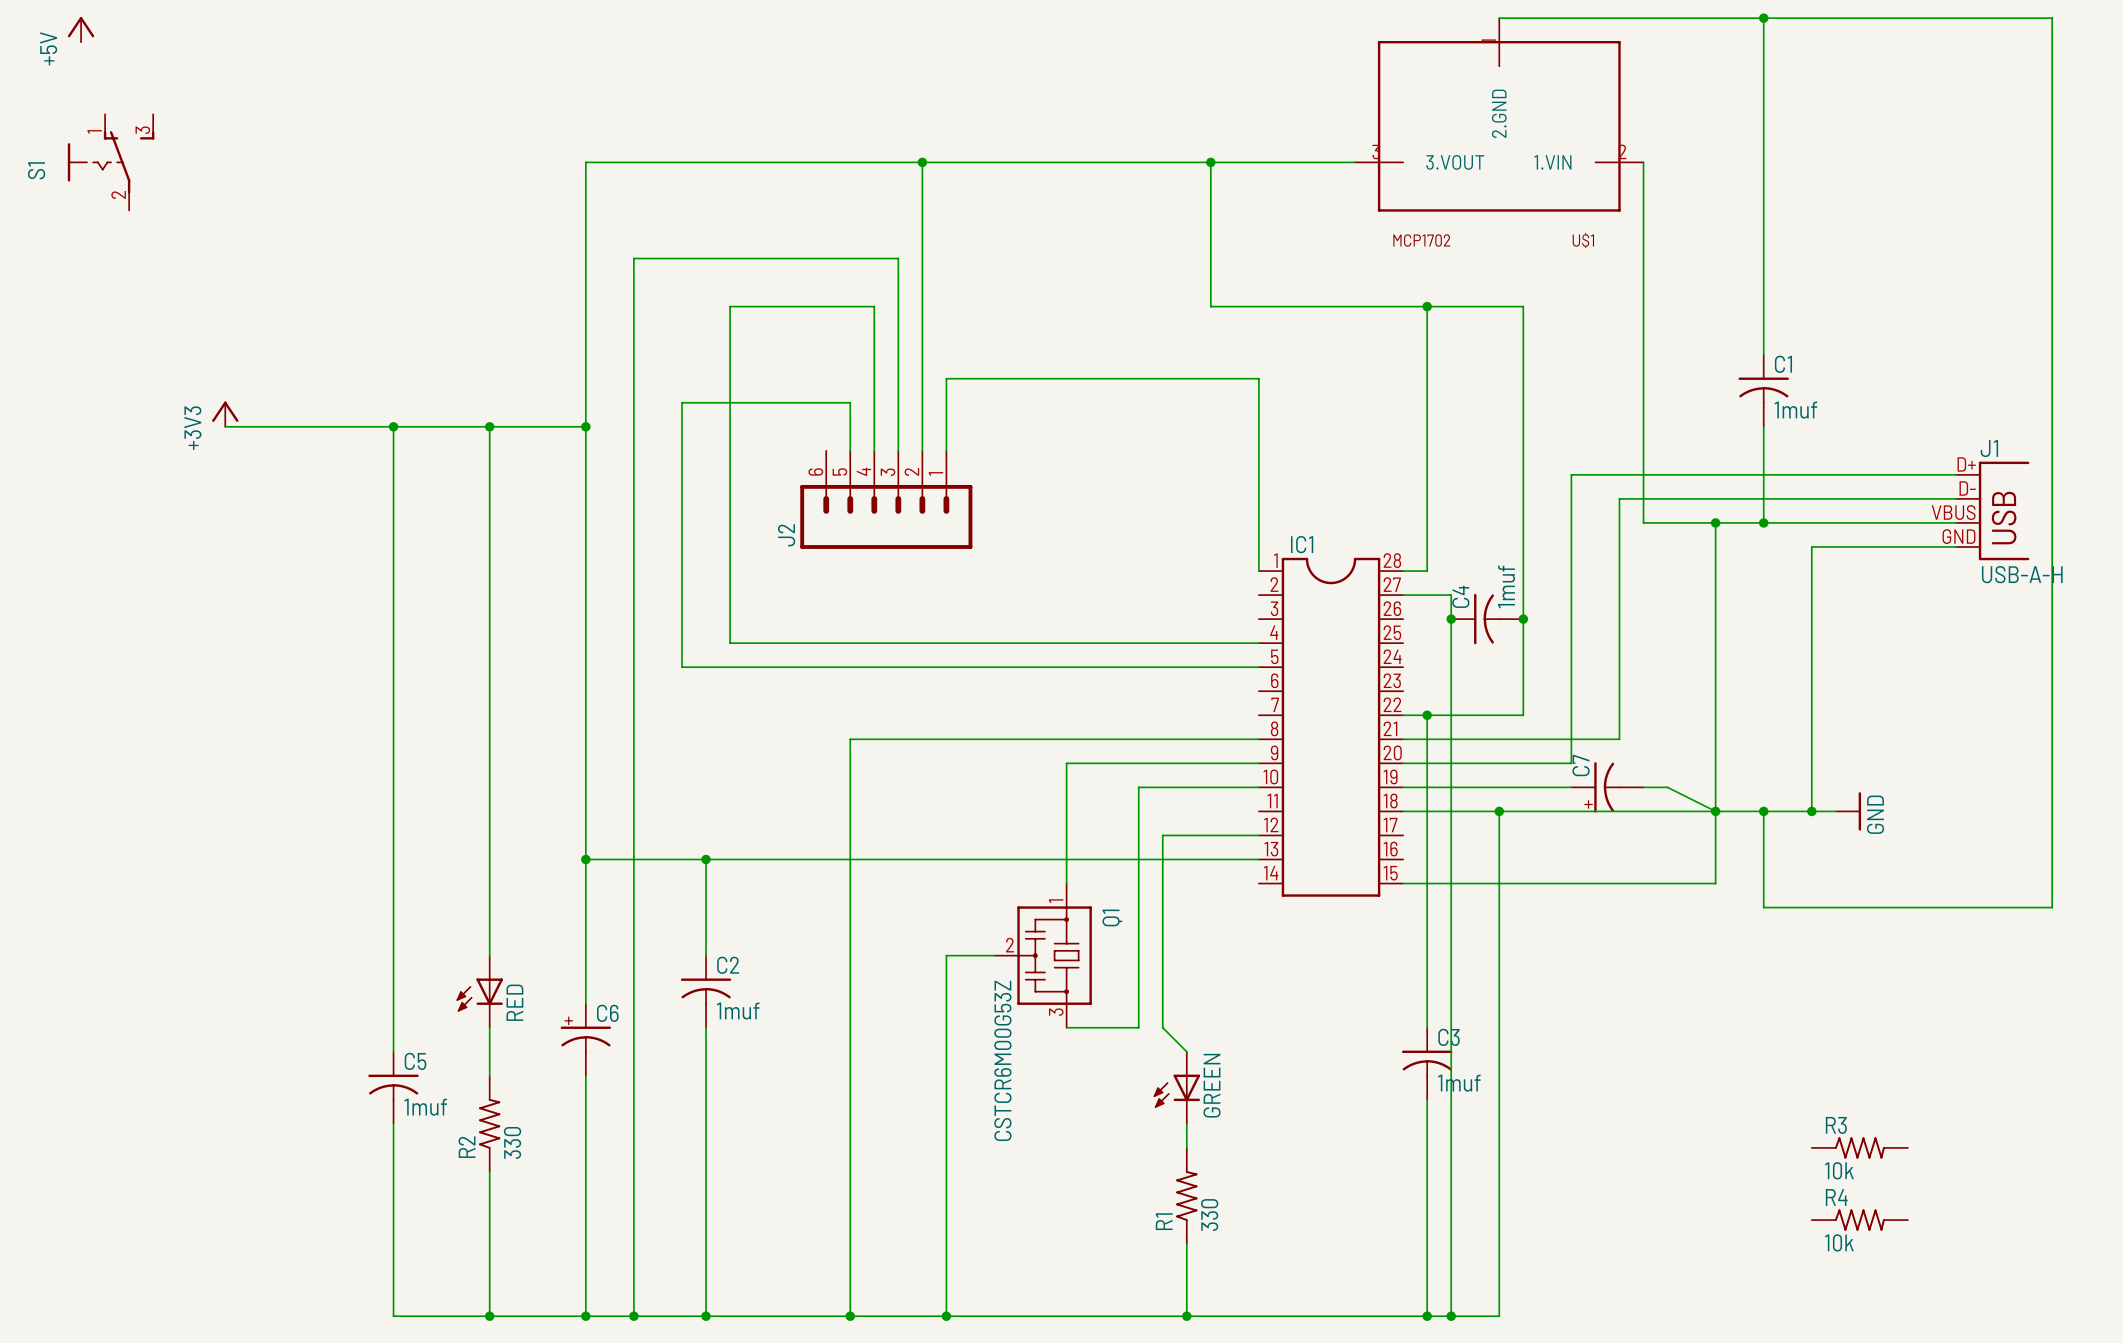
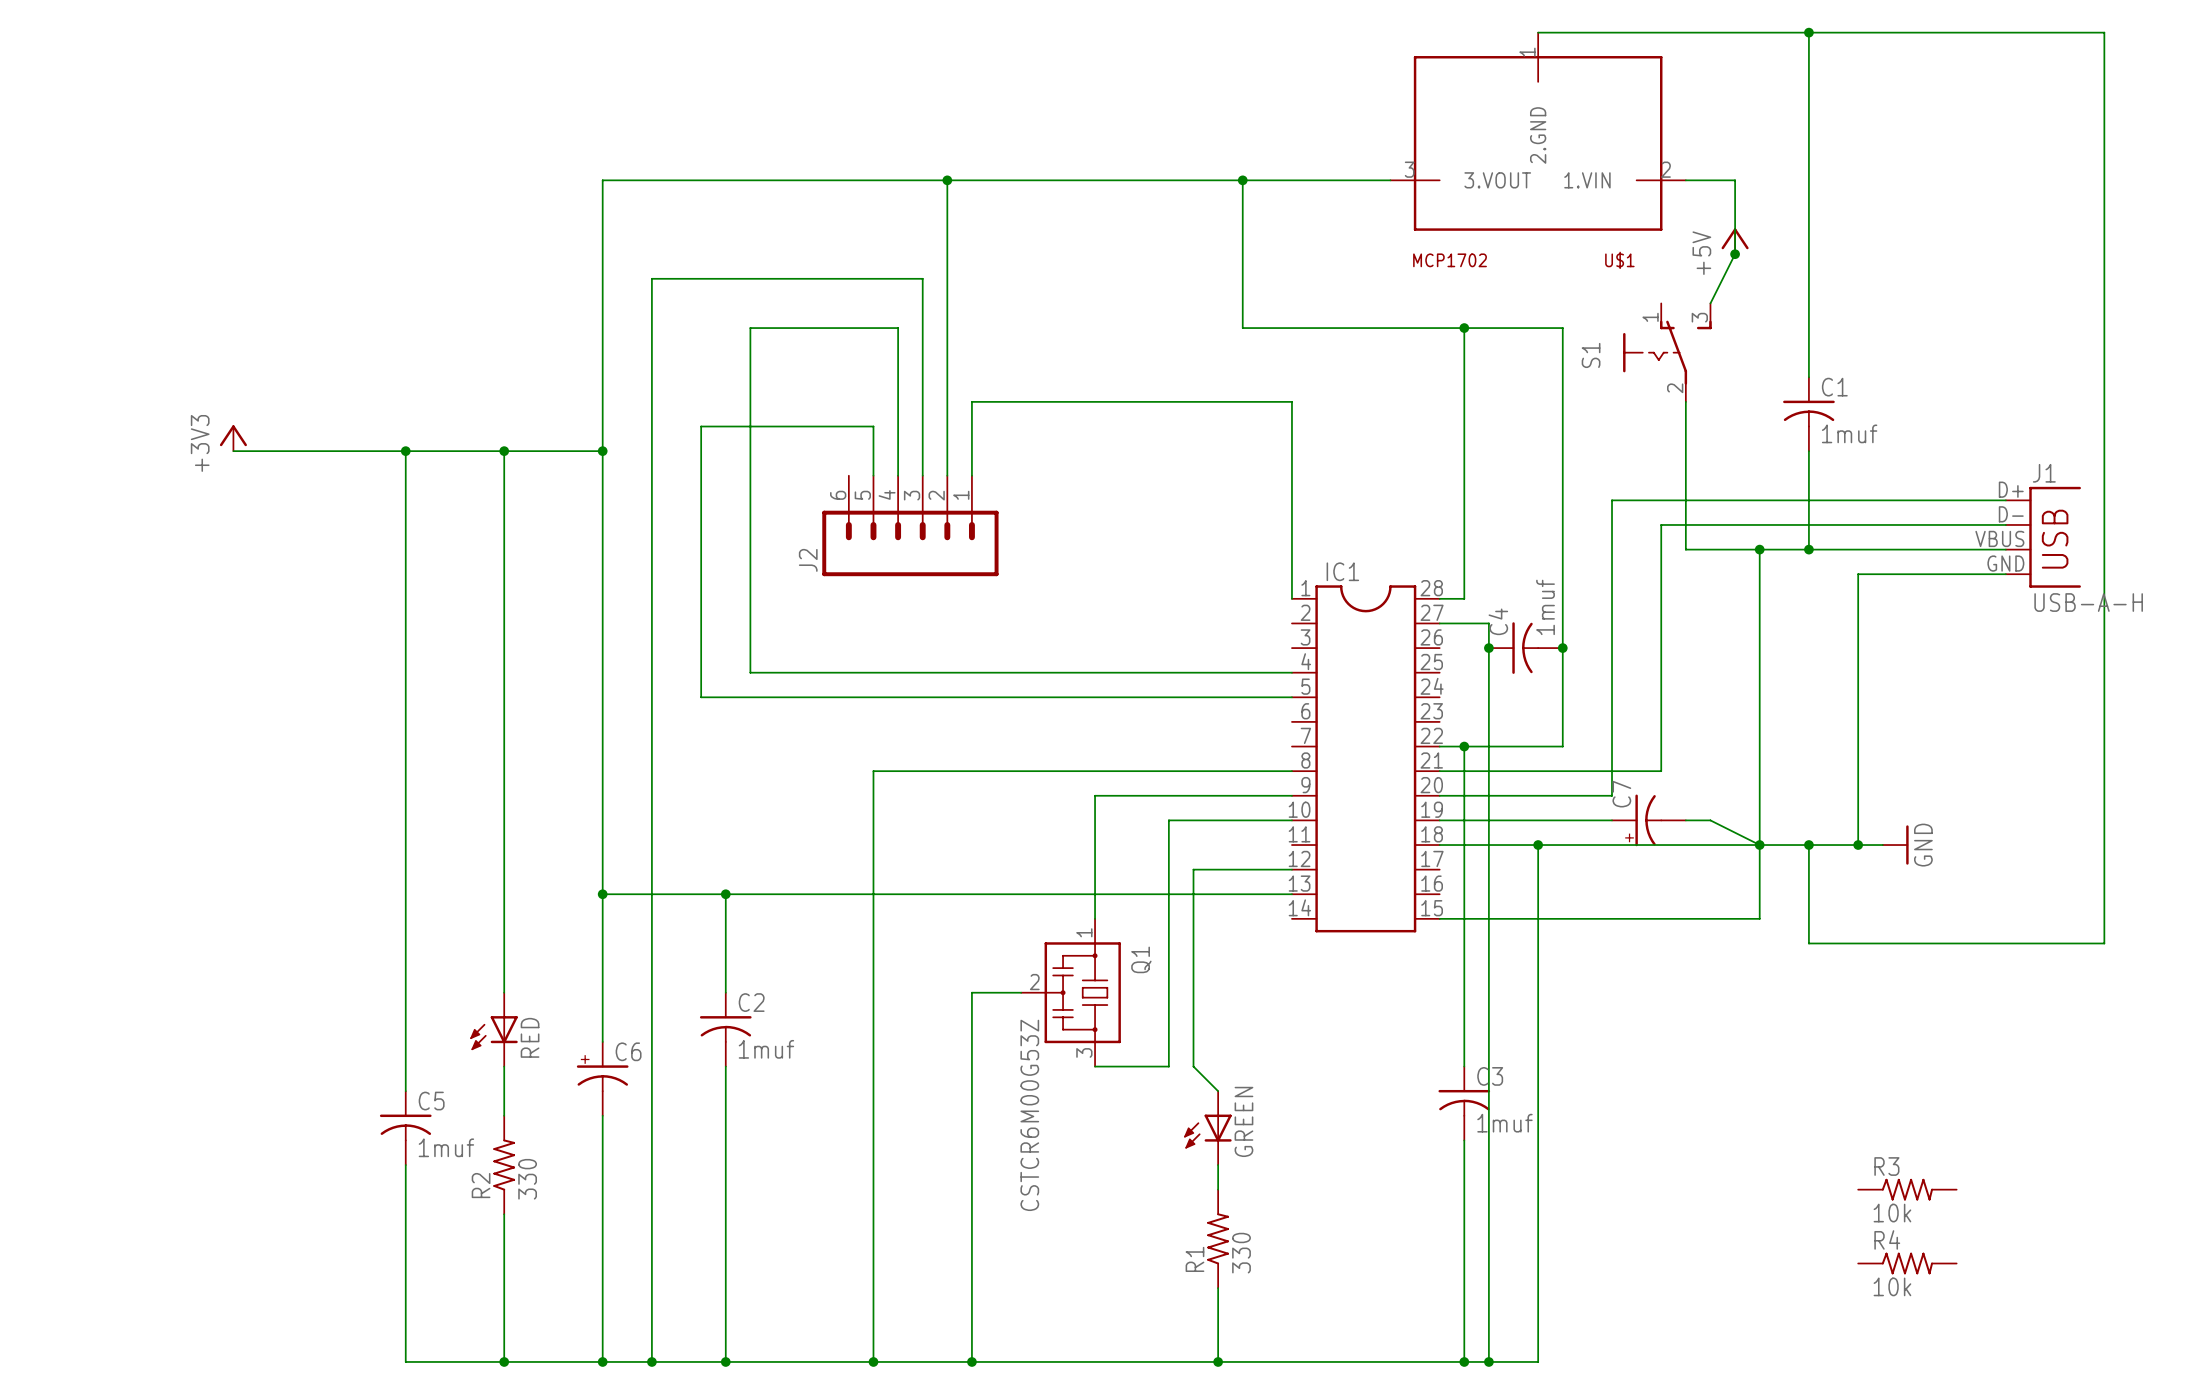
power symbol: +5V (81, 29) -> none
S1 position: (111, 162) -> (1667, 352)
wire: (1643, 162) (1643, 378) -> (1685, 180) (1735, 180) (1735, 254) (1710, 303)
power symbol: none -> +5V (1735, 241)
junction: none -> (1735, 254)

